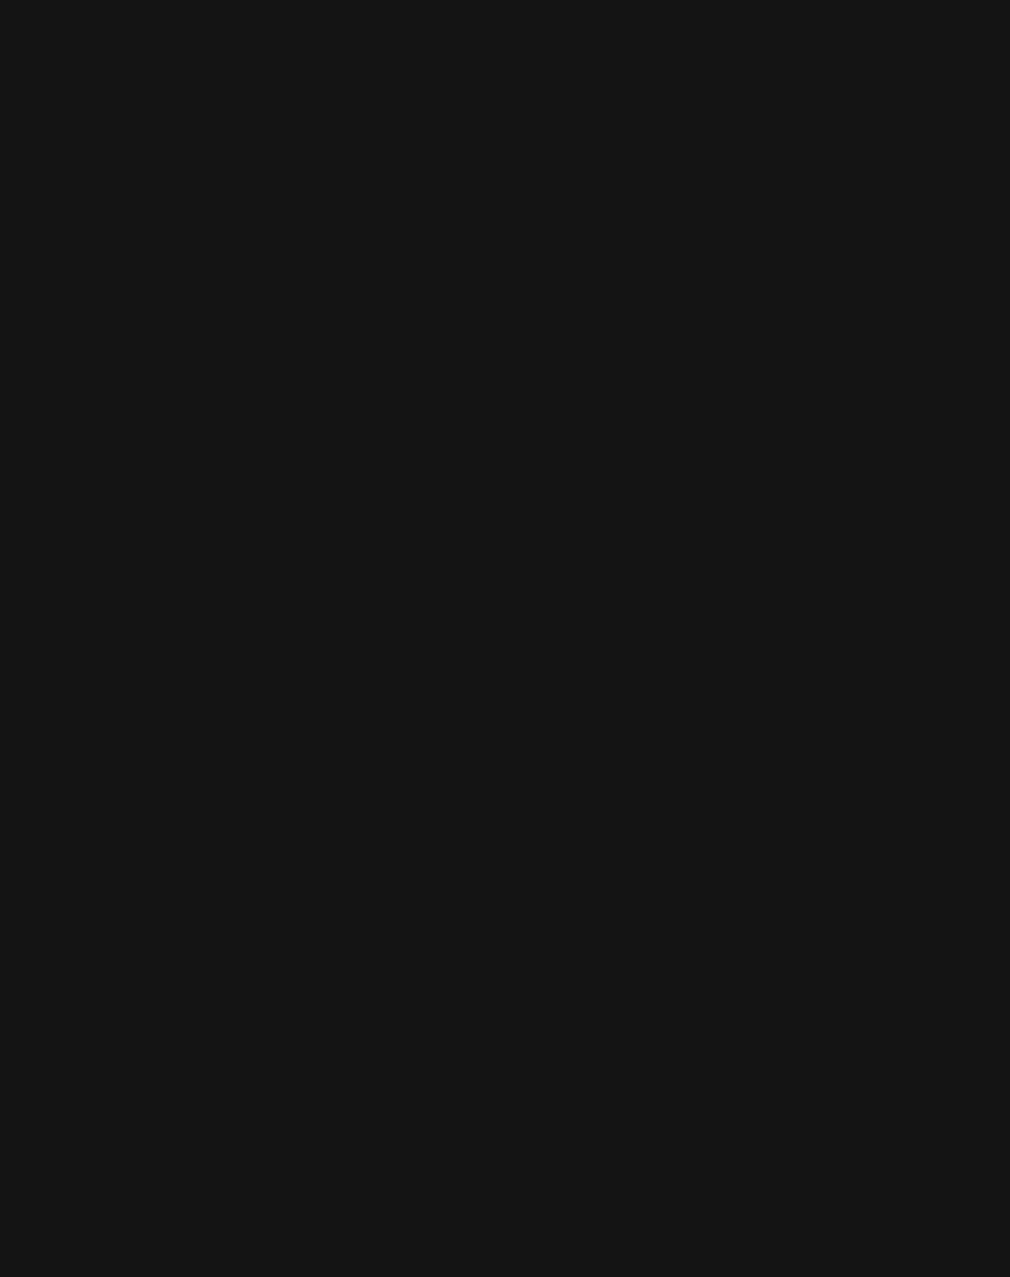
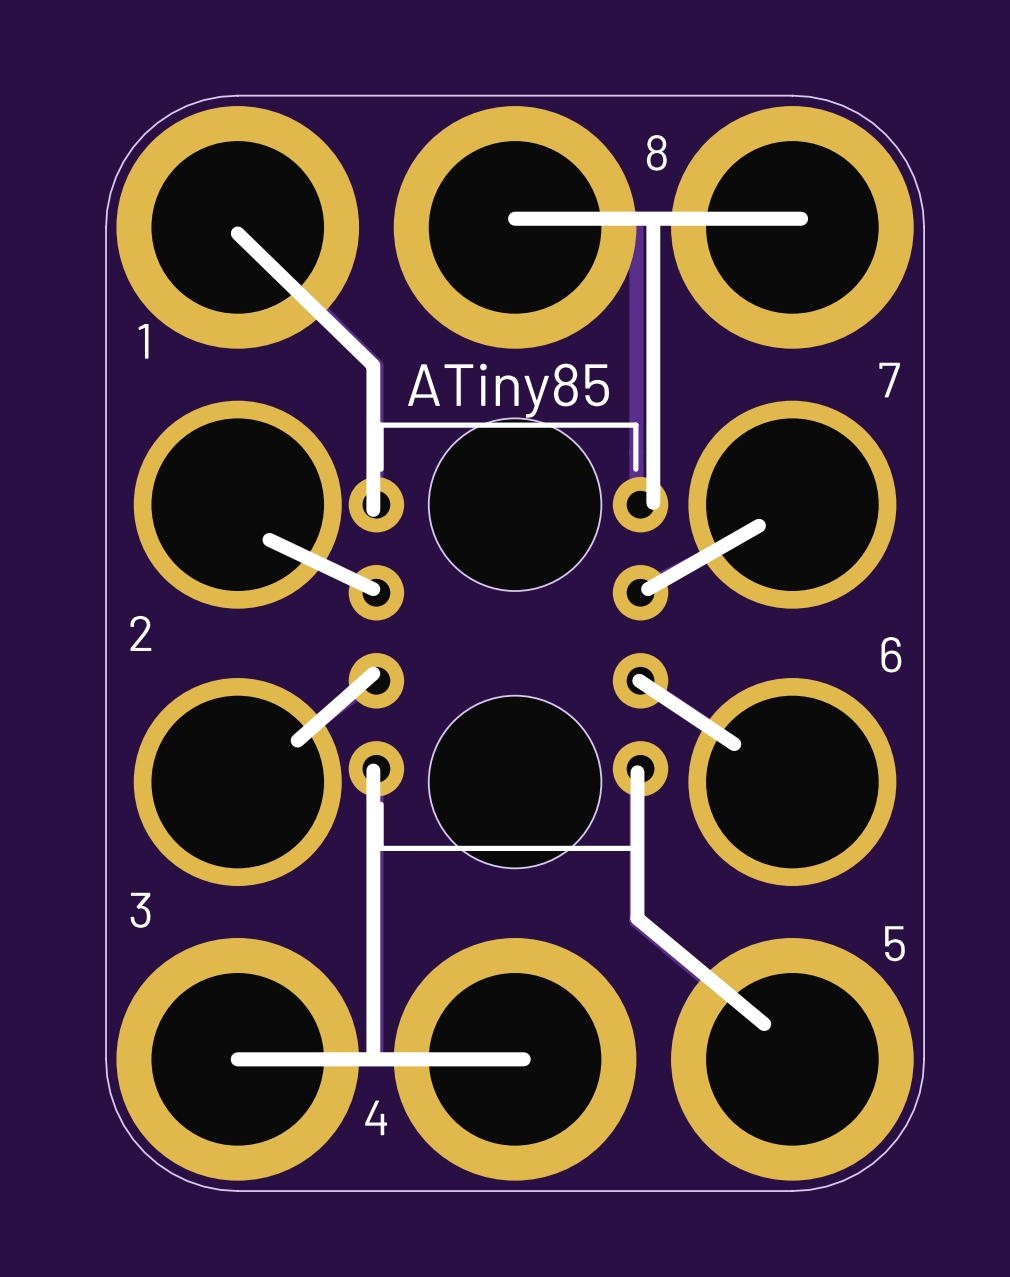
part: none -> (515, 643)

